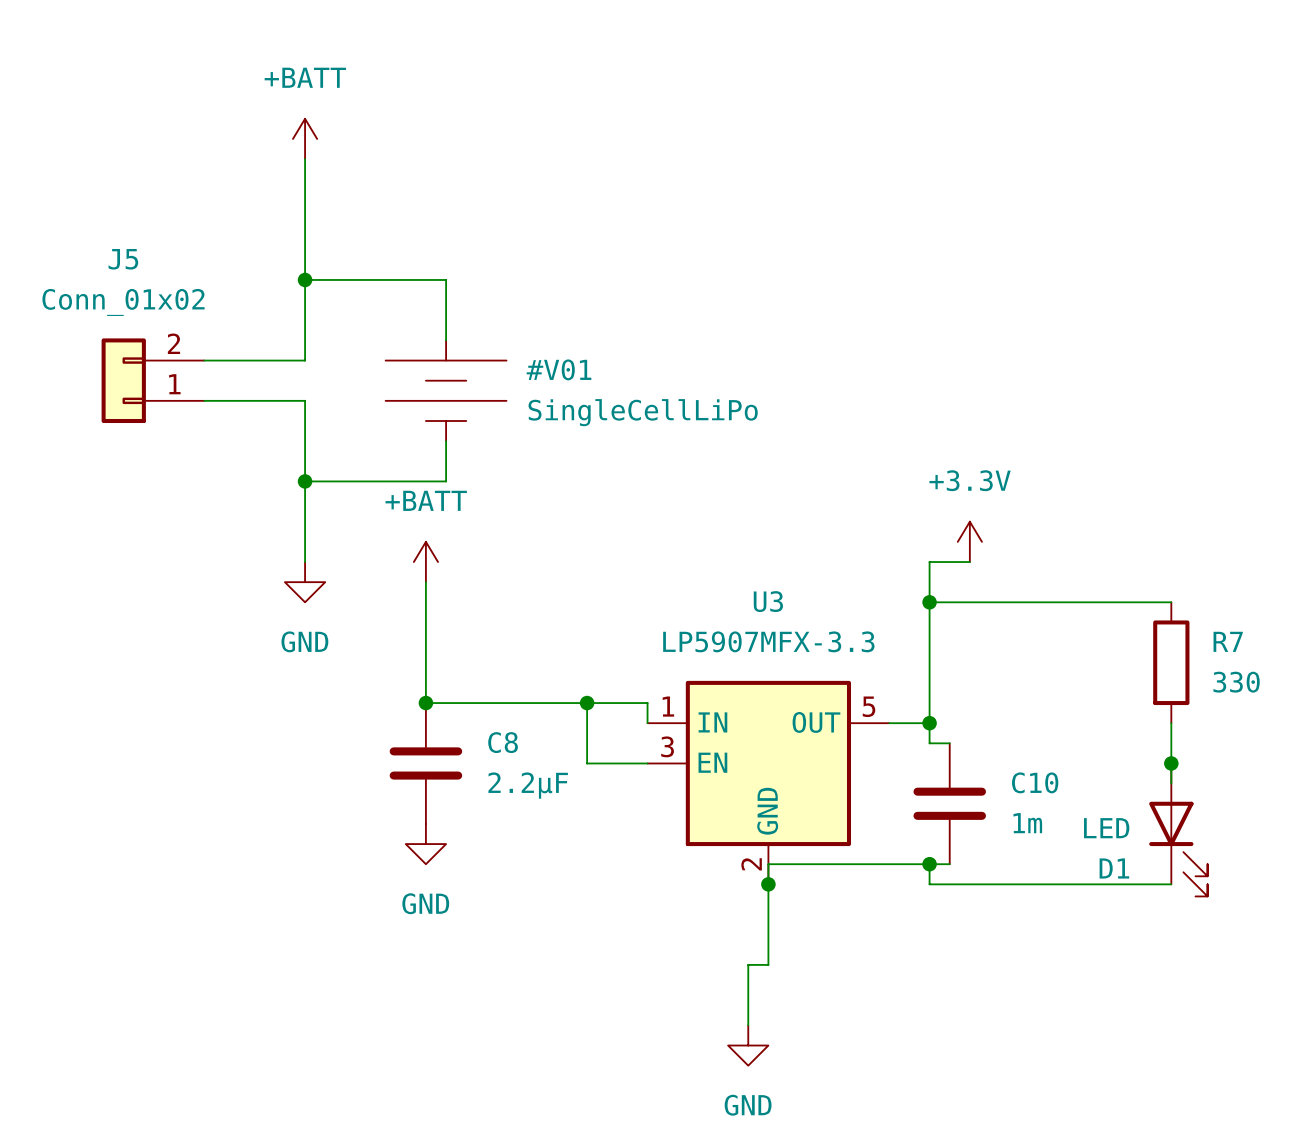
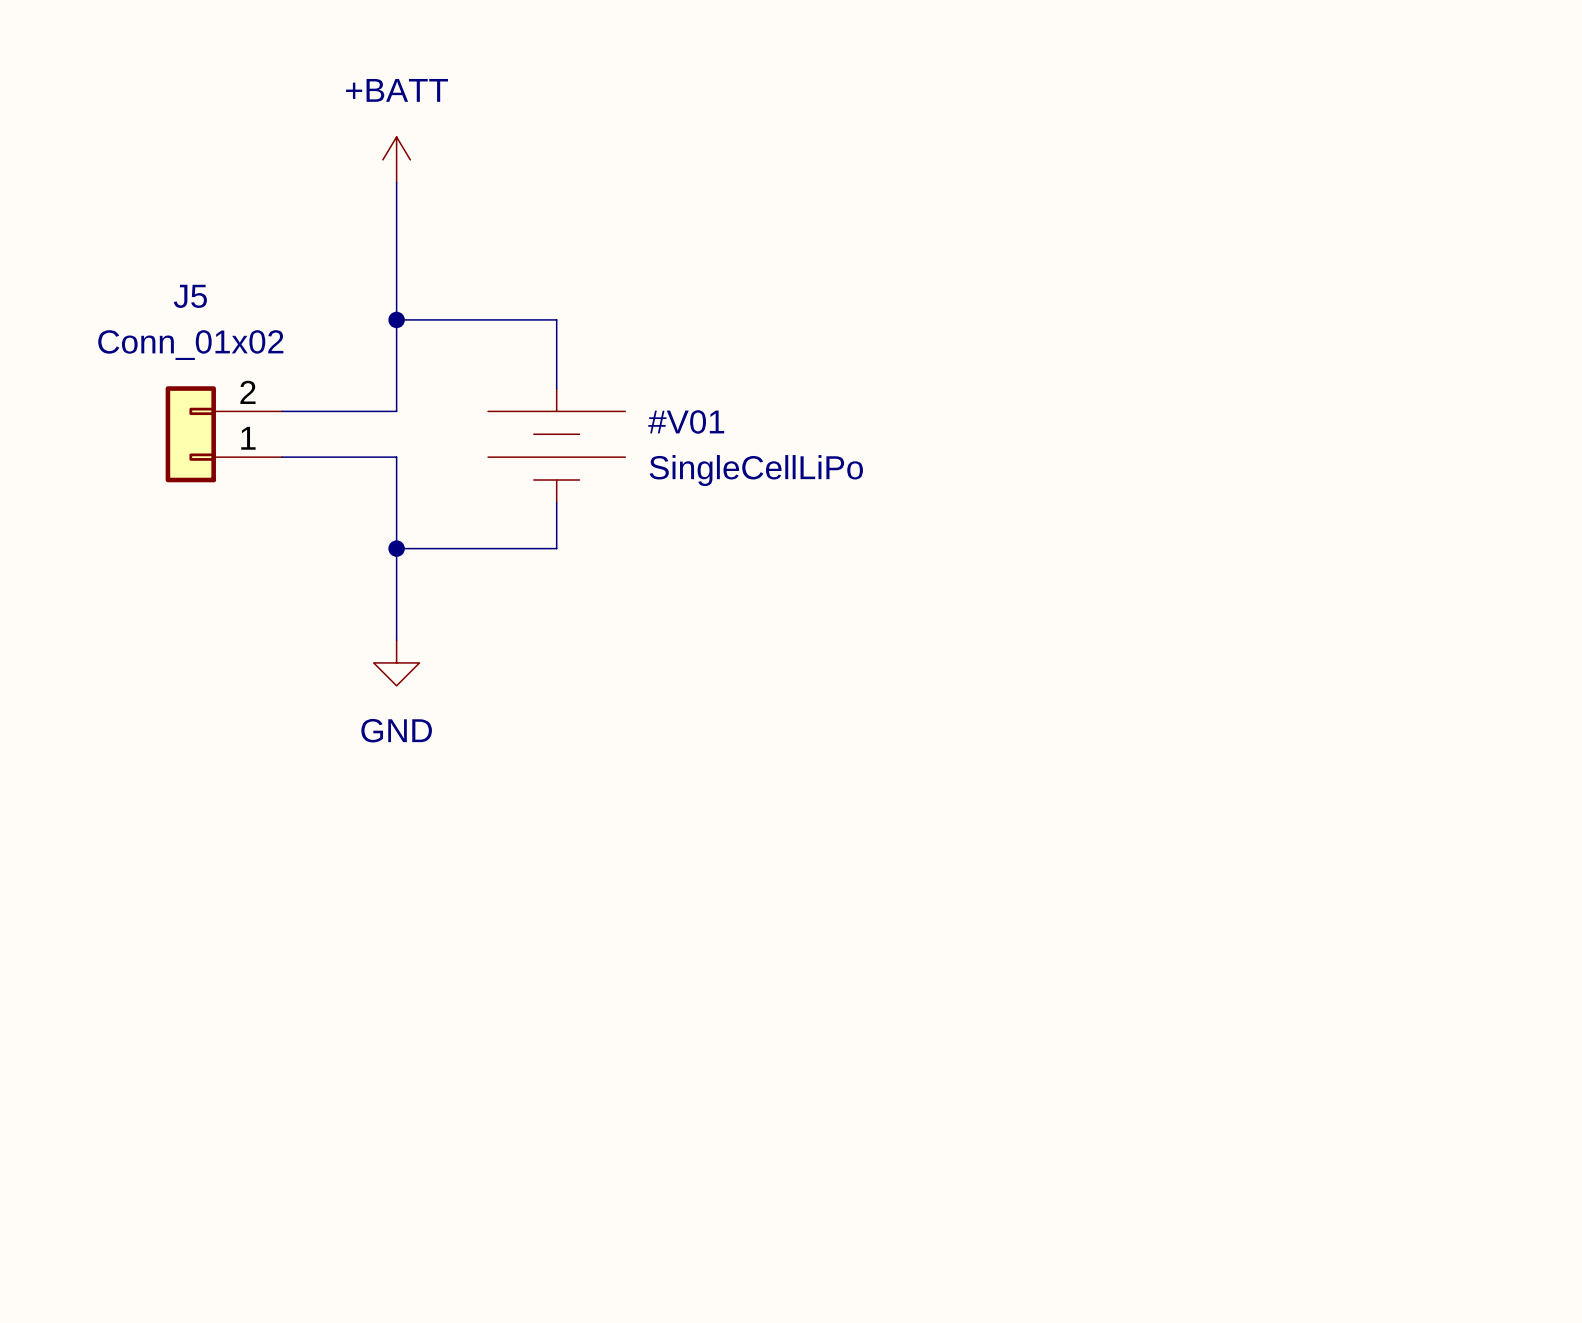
power symbol: +3.3V (969, 541) -> none
power symbol: +BATT (425, 562) -> none
wire: (969, 562) (929, 562) (929, 743) (949, 743) -> none
wire: (425, 582) (425, 703) (647, 703) (647, 723) -> none
wire: (929, 602) (1171, 602) -> none
junction: (929, 602) -> none
R7: 330 (1171, 662) -> none
junction: (425, 703) -> none
wire: (587, 703) (587, 763) (647, 763) -> none
junction: (587, 703) -> none
wire: (889, 723) (929, 723) -> none
junction: (929, 723) -> none
wire: (1171, 723) (1171, 783) -> none
C8: 2.2µF (425, 763) -> none
junction: (1171, 763) -> none
U3: LP5907MFX-3.3 (768, 782) -> none
C10: 1m (949, 803) -> none
D1: LED (1178, 829) -> none
power symbol: GND (425, 844) -> none
wire: (929, 864) (929, 884) (1171, 884) -> none
junction: (929, 864) -> none
wire: (949, 864) (768, 864) (768, 964) (748, 964) (748, 1025) -> none
junction: (768, 884) -> none
power symbol: GND (748, 1045) -> none

